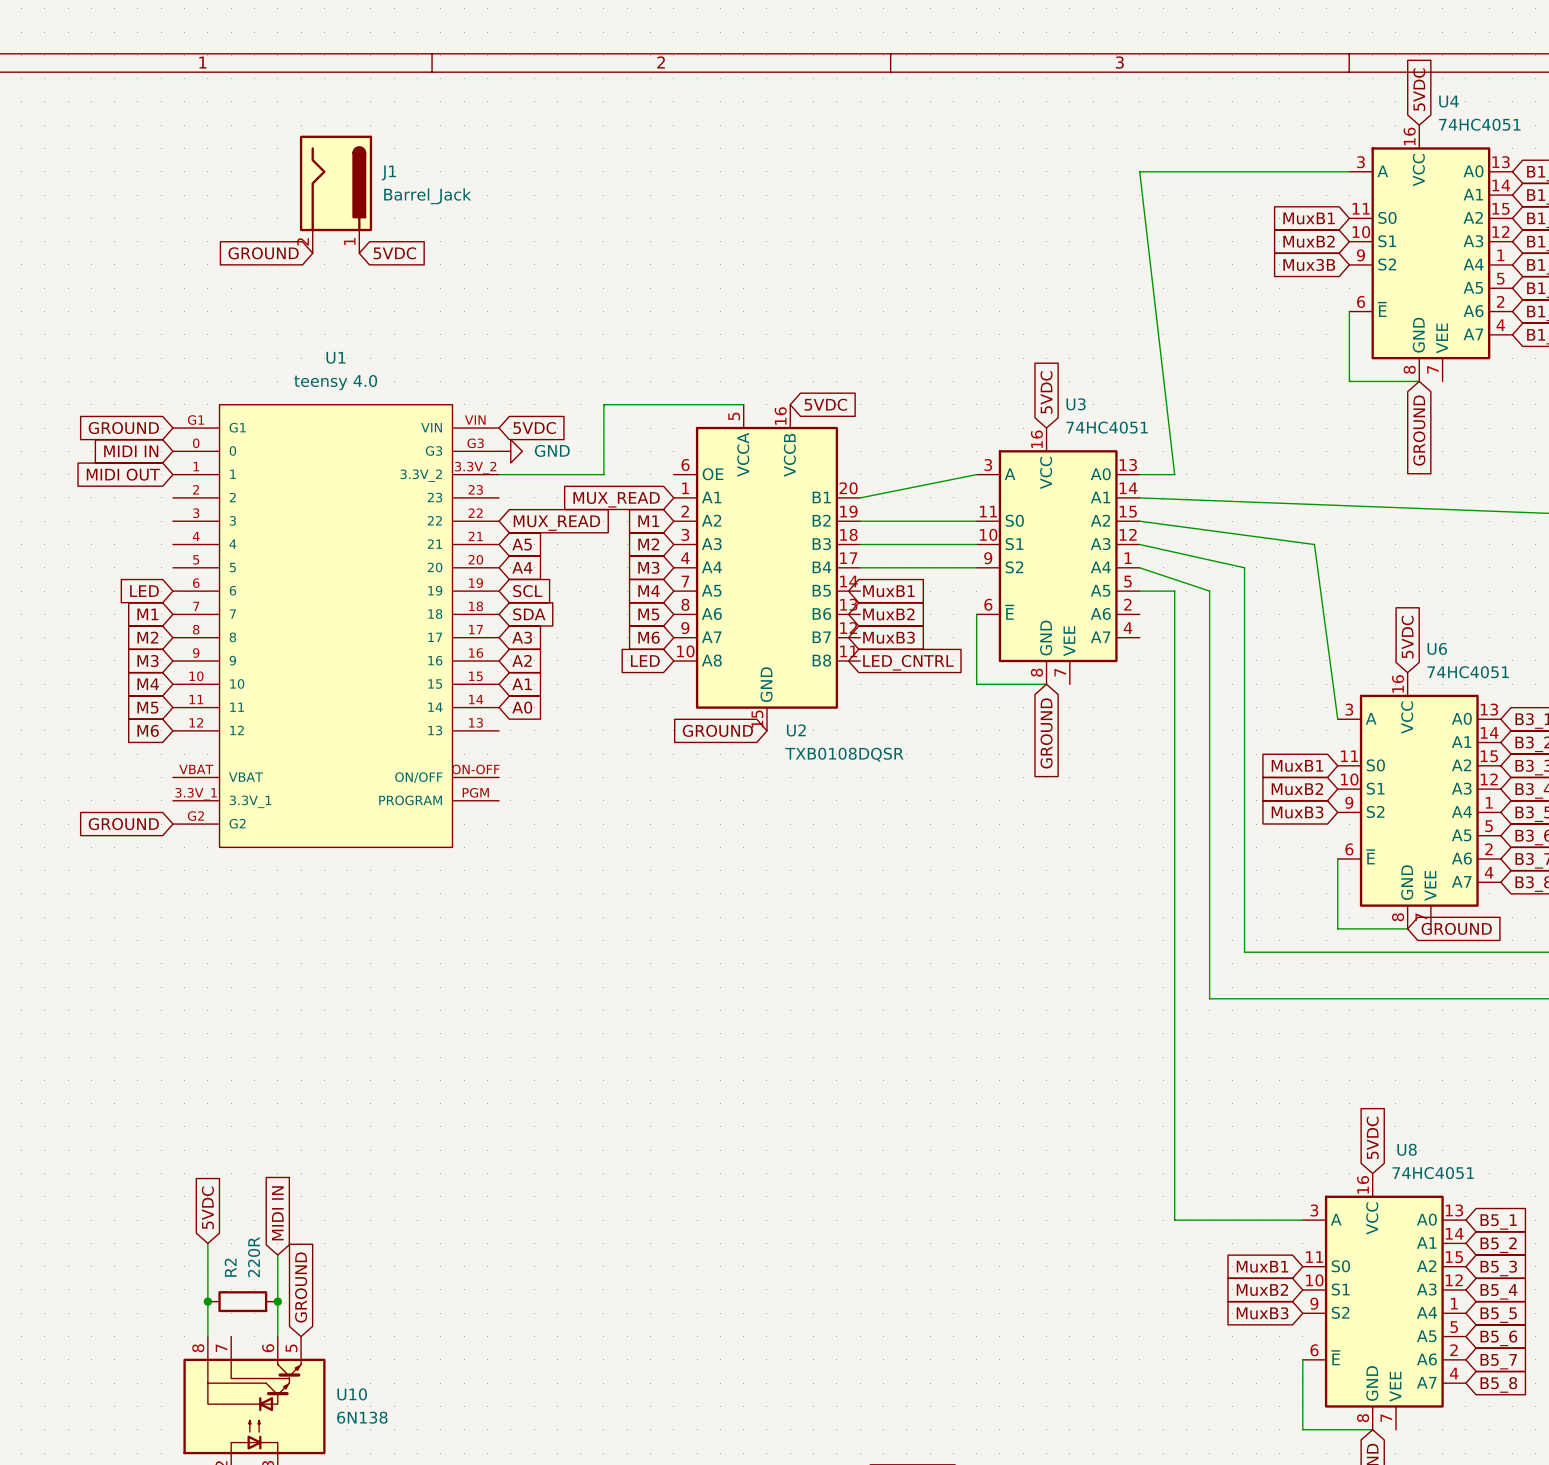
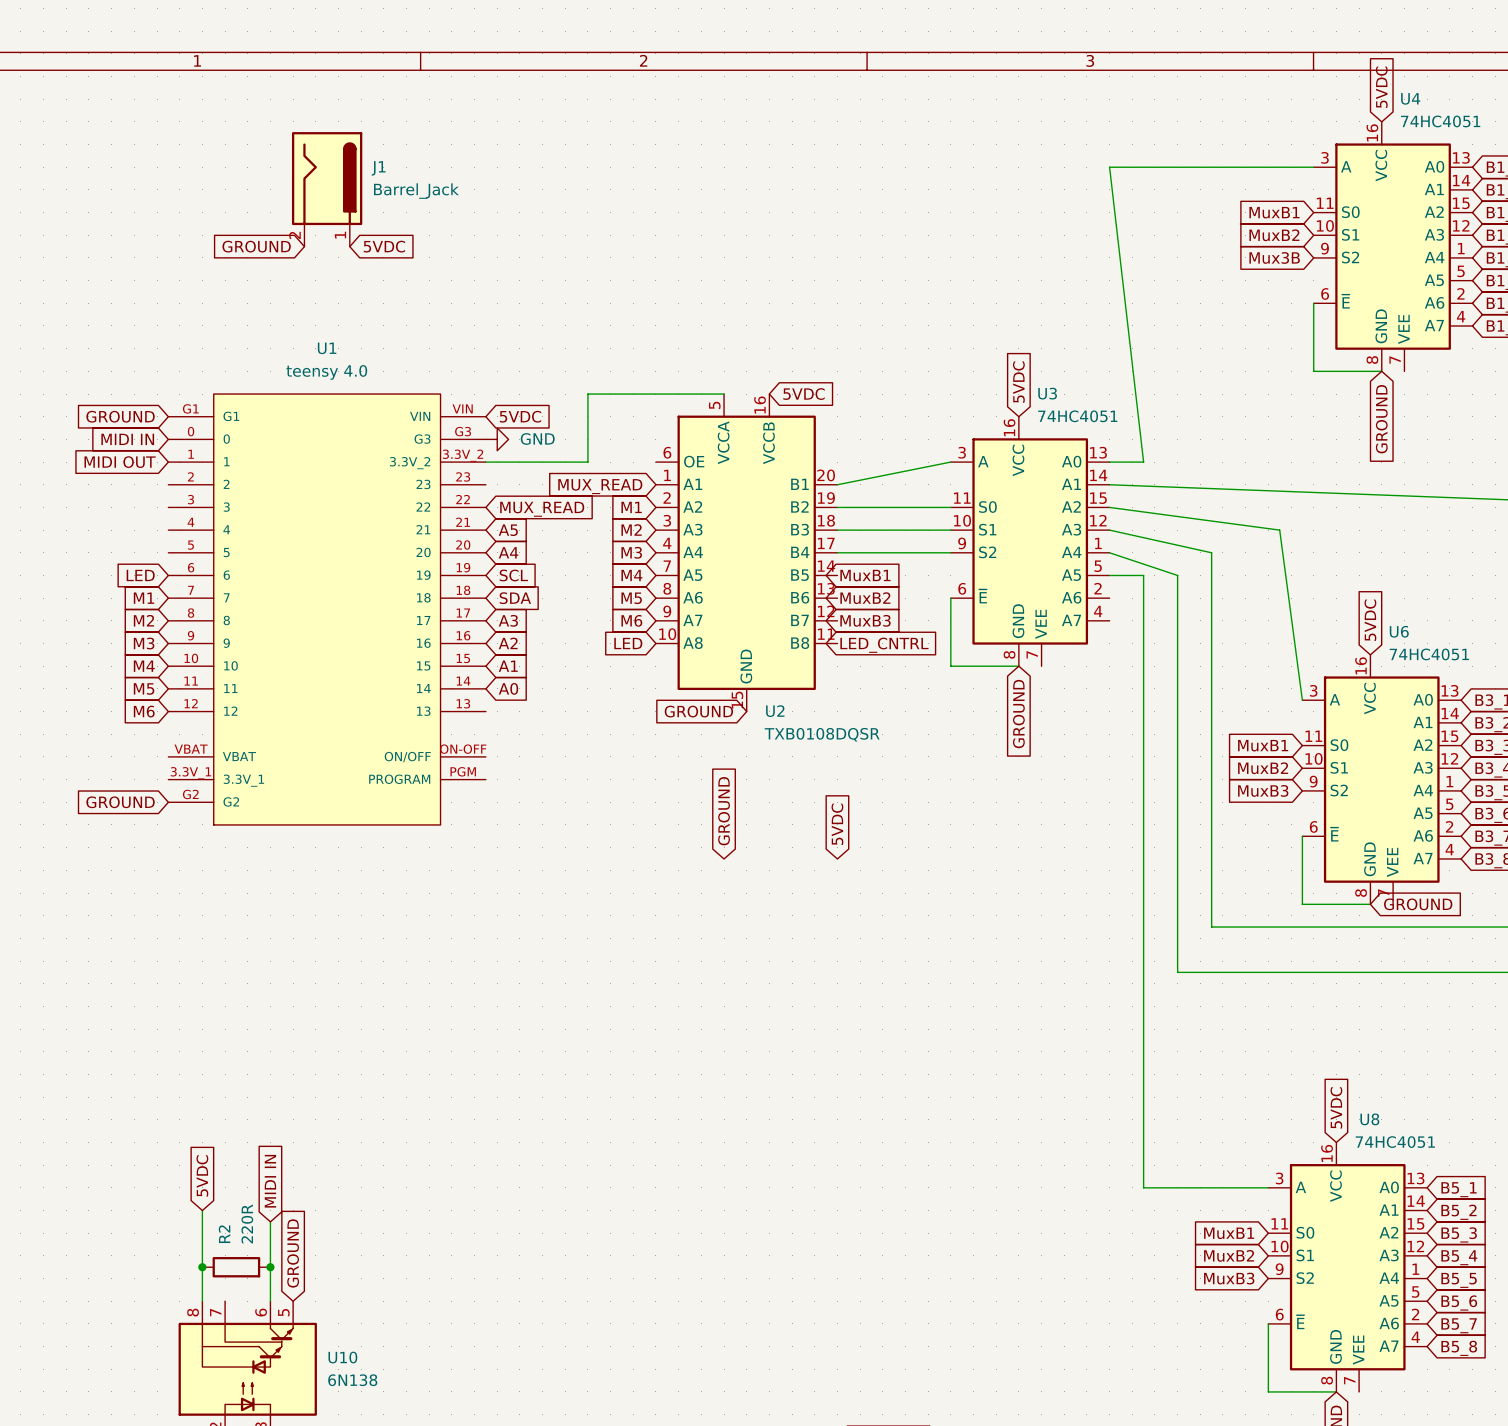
global label: none -> GROUND (724, 811)
global label: none -> 5VDC (837, 824)

